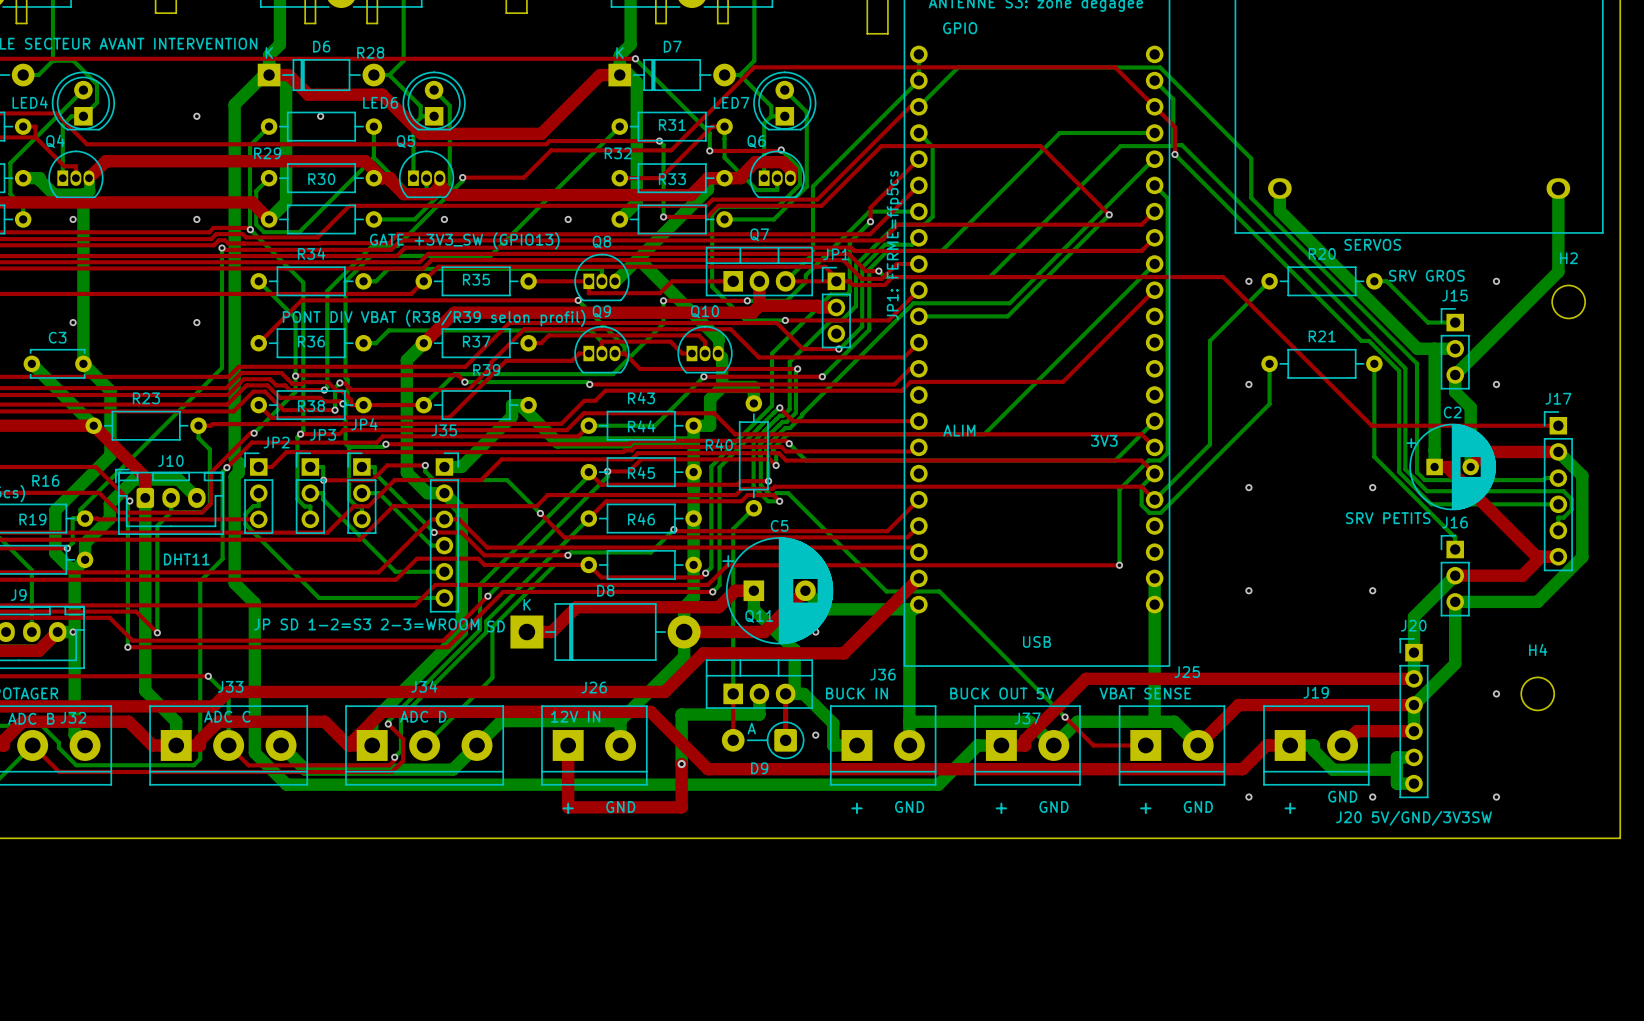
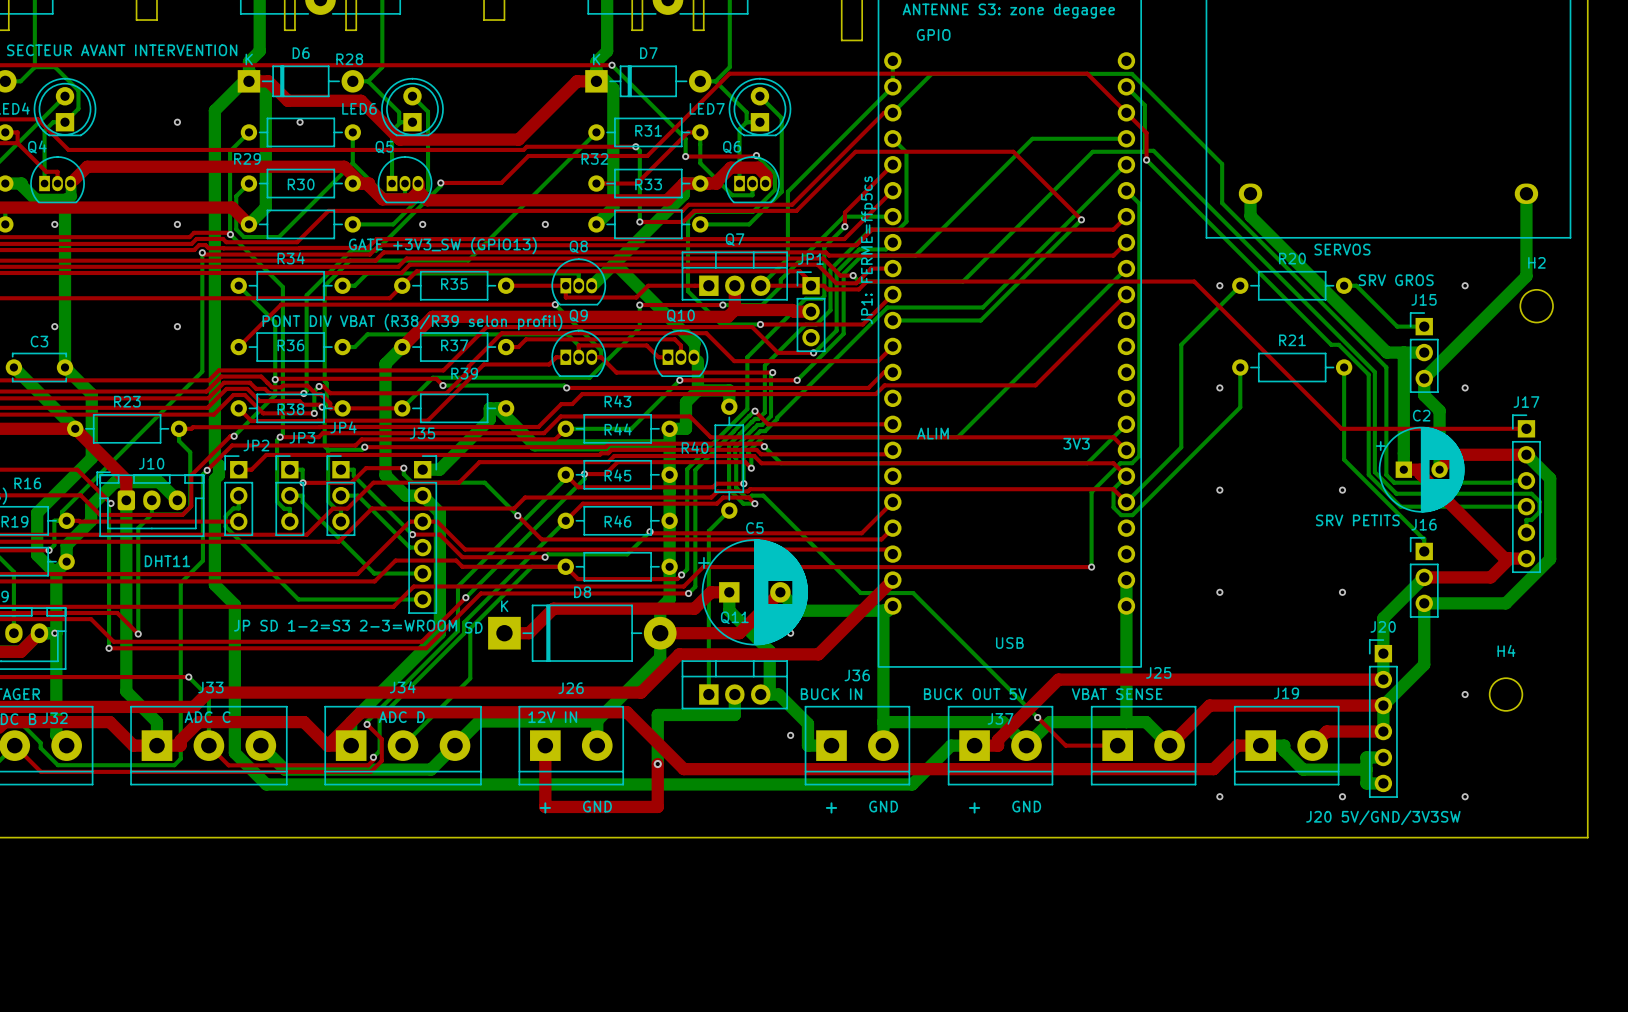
top track: (733, 693) (733, 740) -> none
top track: (785, 693) (785, 740) -> none
D9: (763, 740) -> none
text: GND (1342, 796) -> none
text: GND (1198, 806) -> none
text: + (1145, 808) -> none
text: + (1290, 808) -> none

